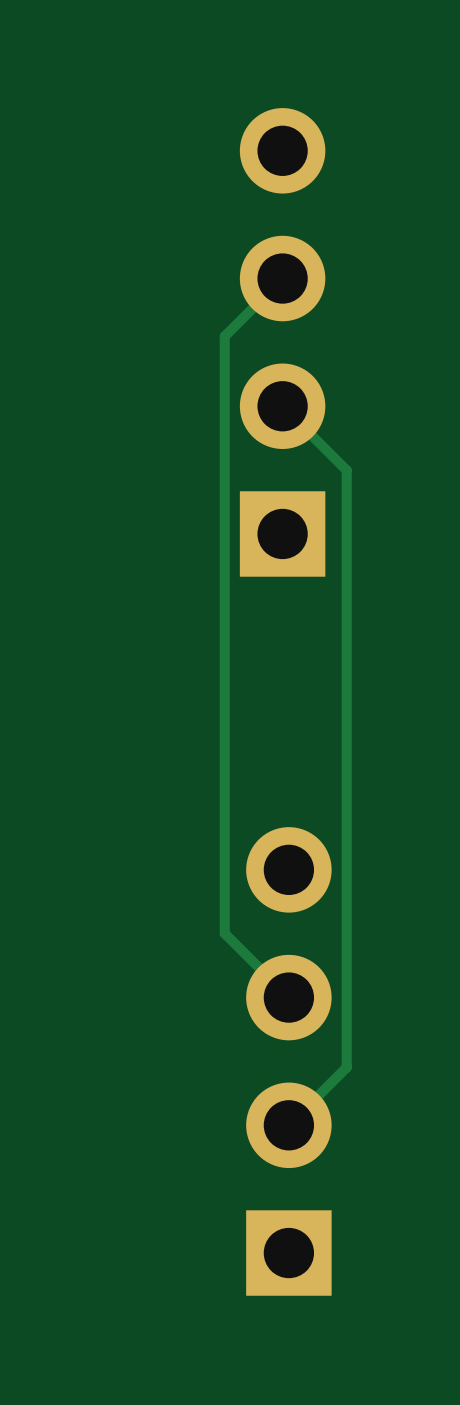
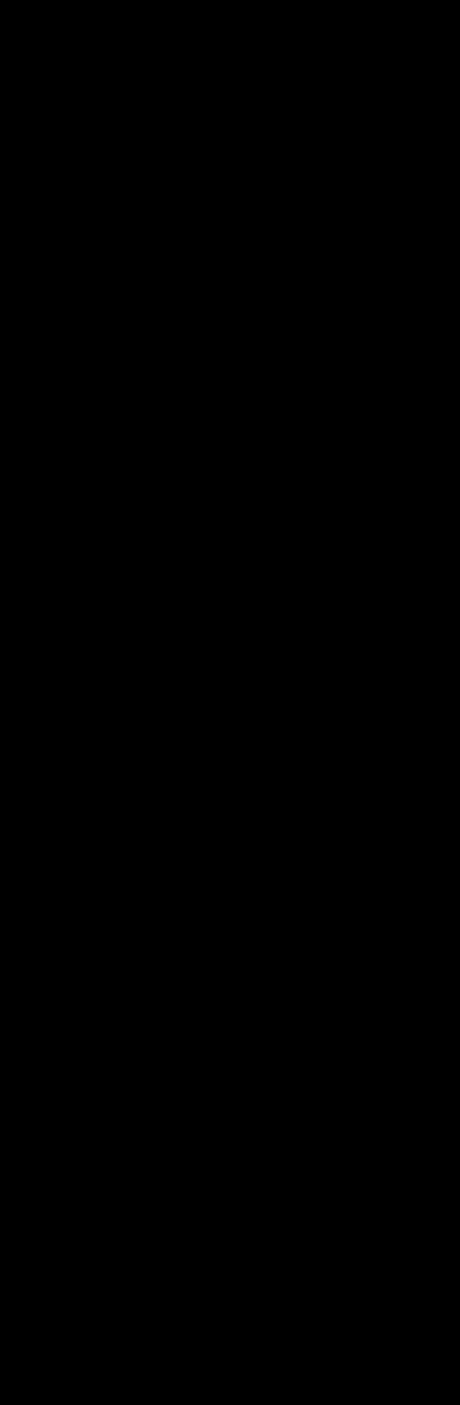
track: (282, 278) (224, 336) (224, 933) (288, 997) -> none
part: (282, 342) -> none
track: (282, 406) (346, 470) (346, 1067) (288, 1125) -> none
part: (288, 1061) -> none

